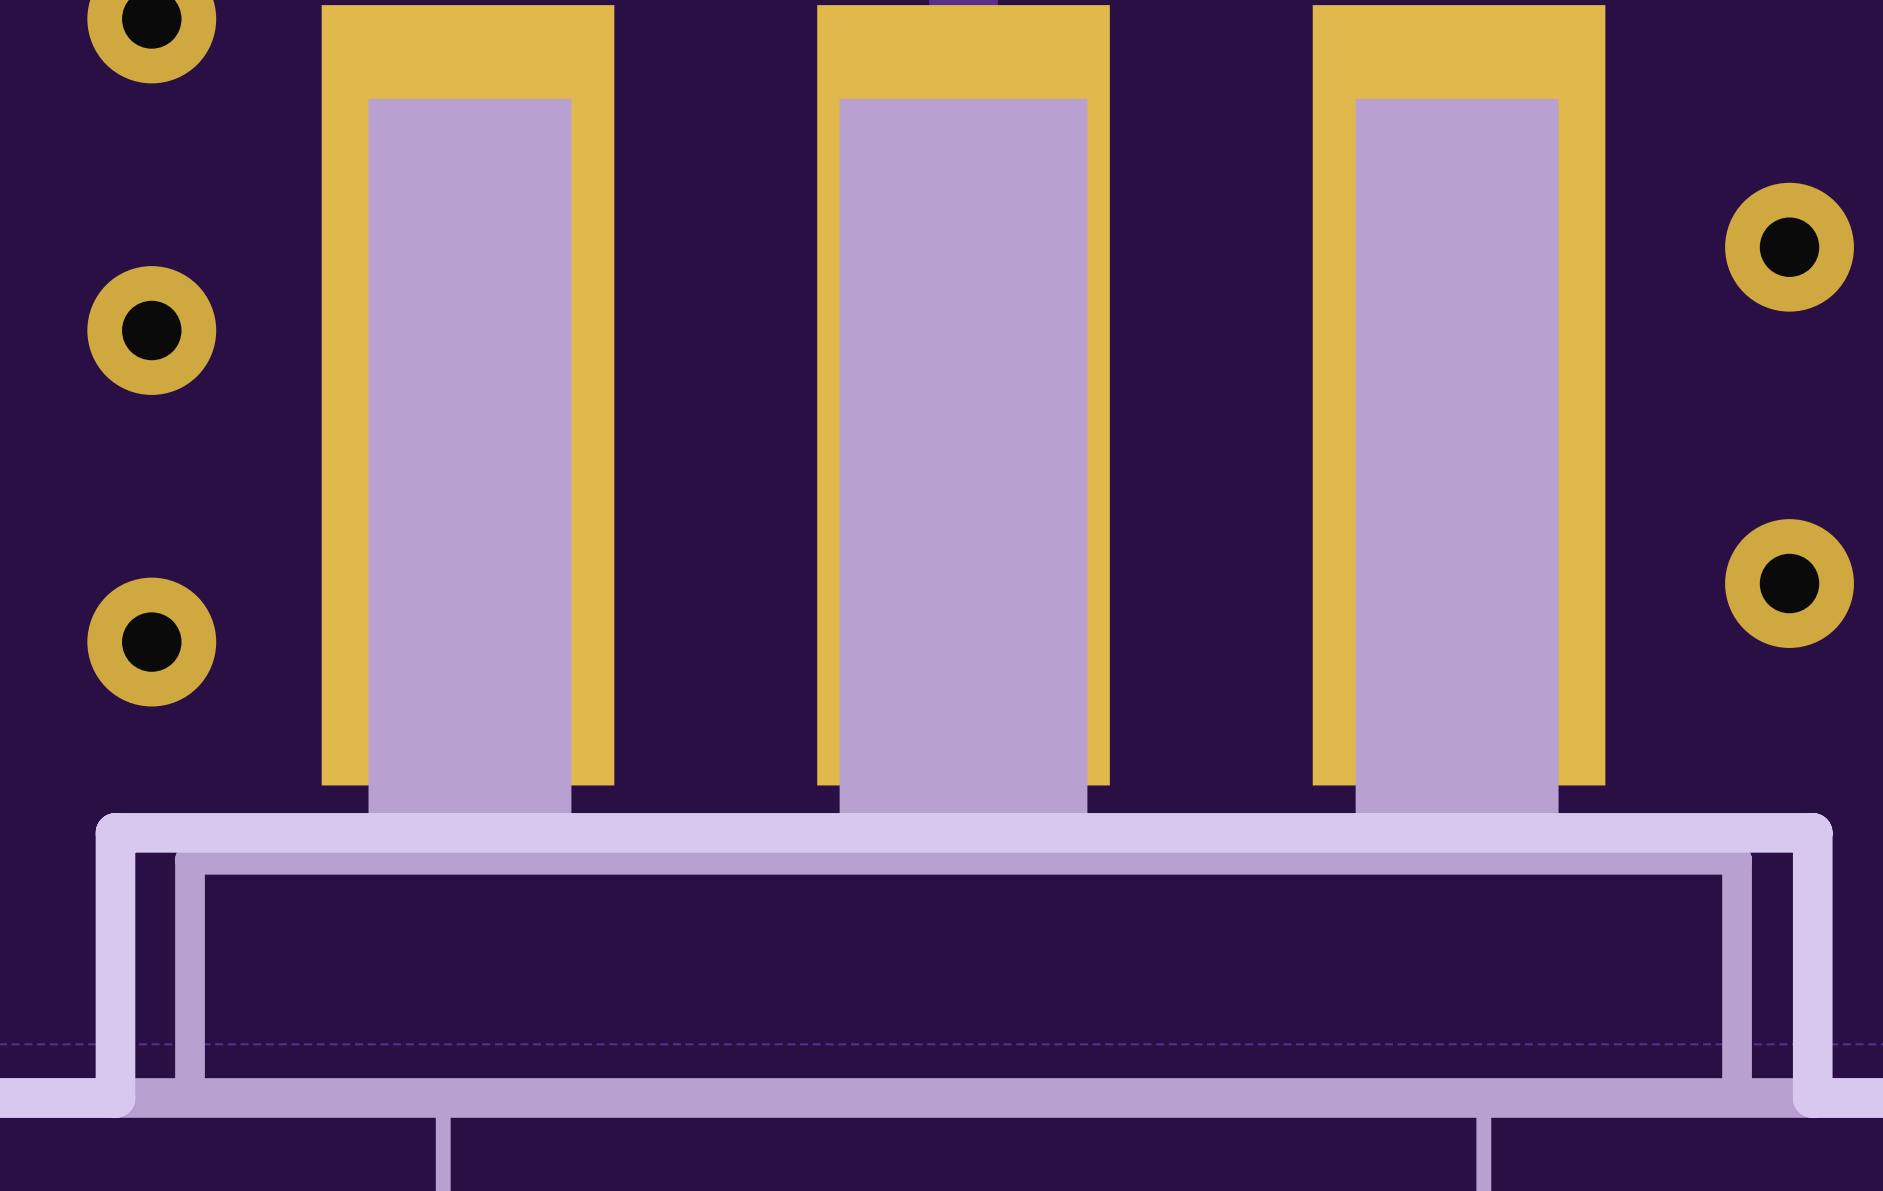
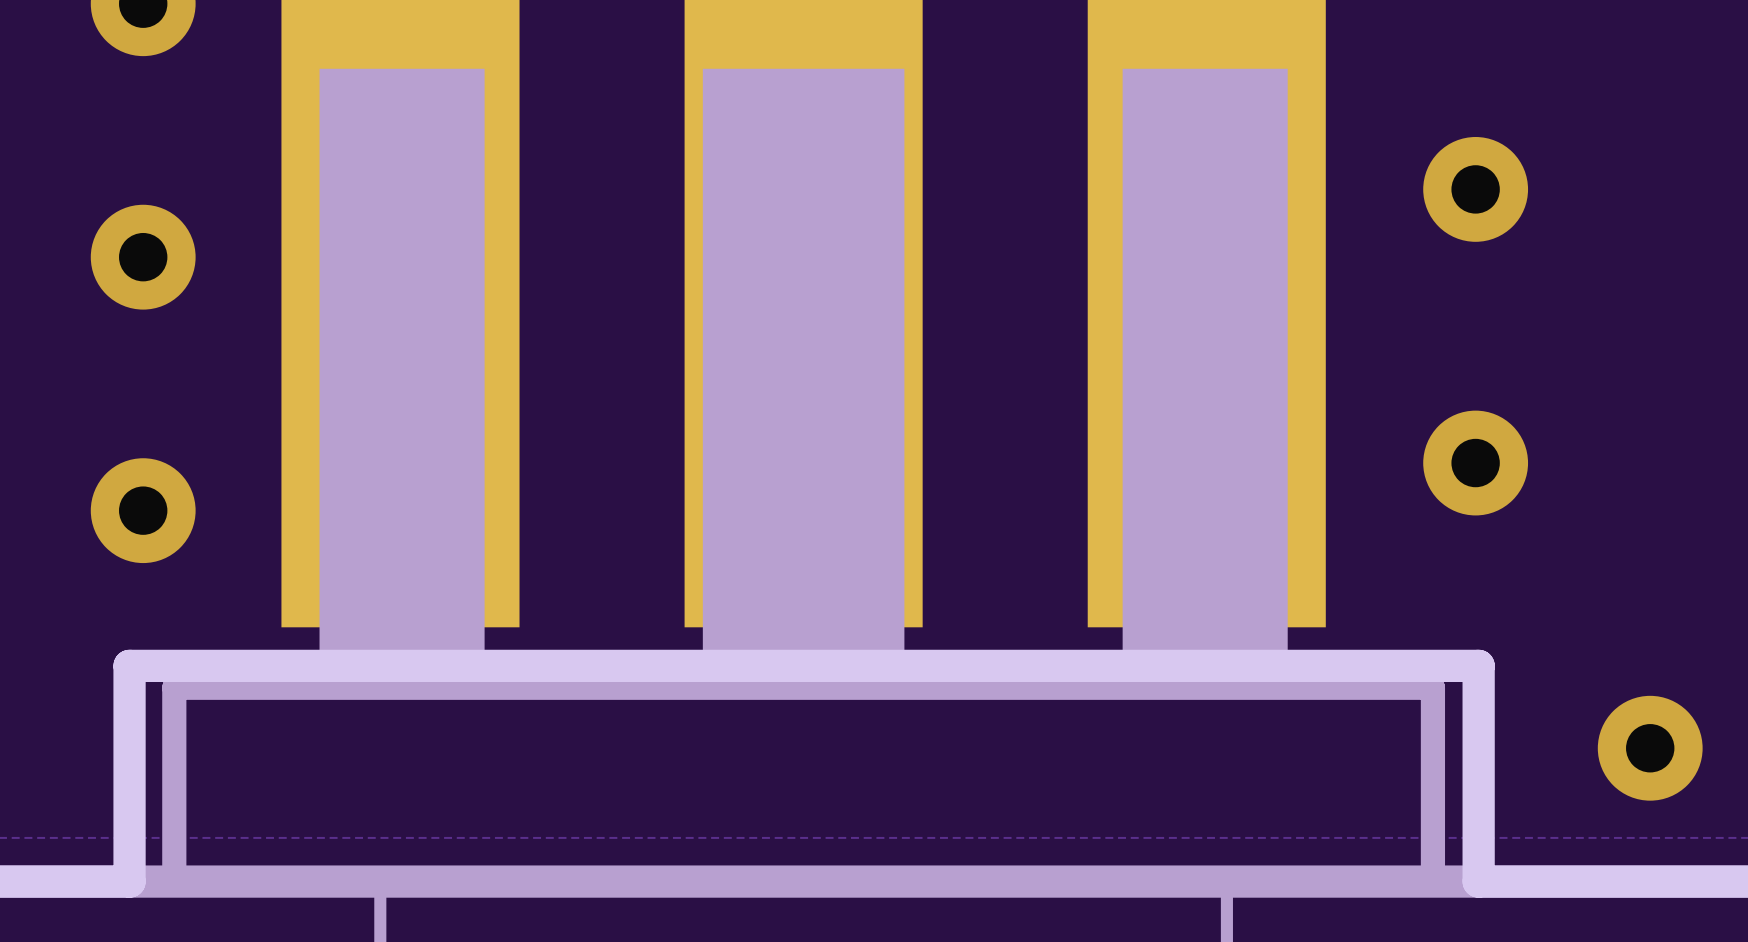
board edge: (134, 832) (115, 832) (115, 1097) -> (129, 665) (129, 881) (113, 881)
board edge: (1793, 832) (1812, 832) (1812, 1097) -> (1478, 665) (1478, 881) (1494, 881)

